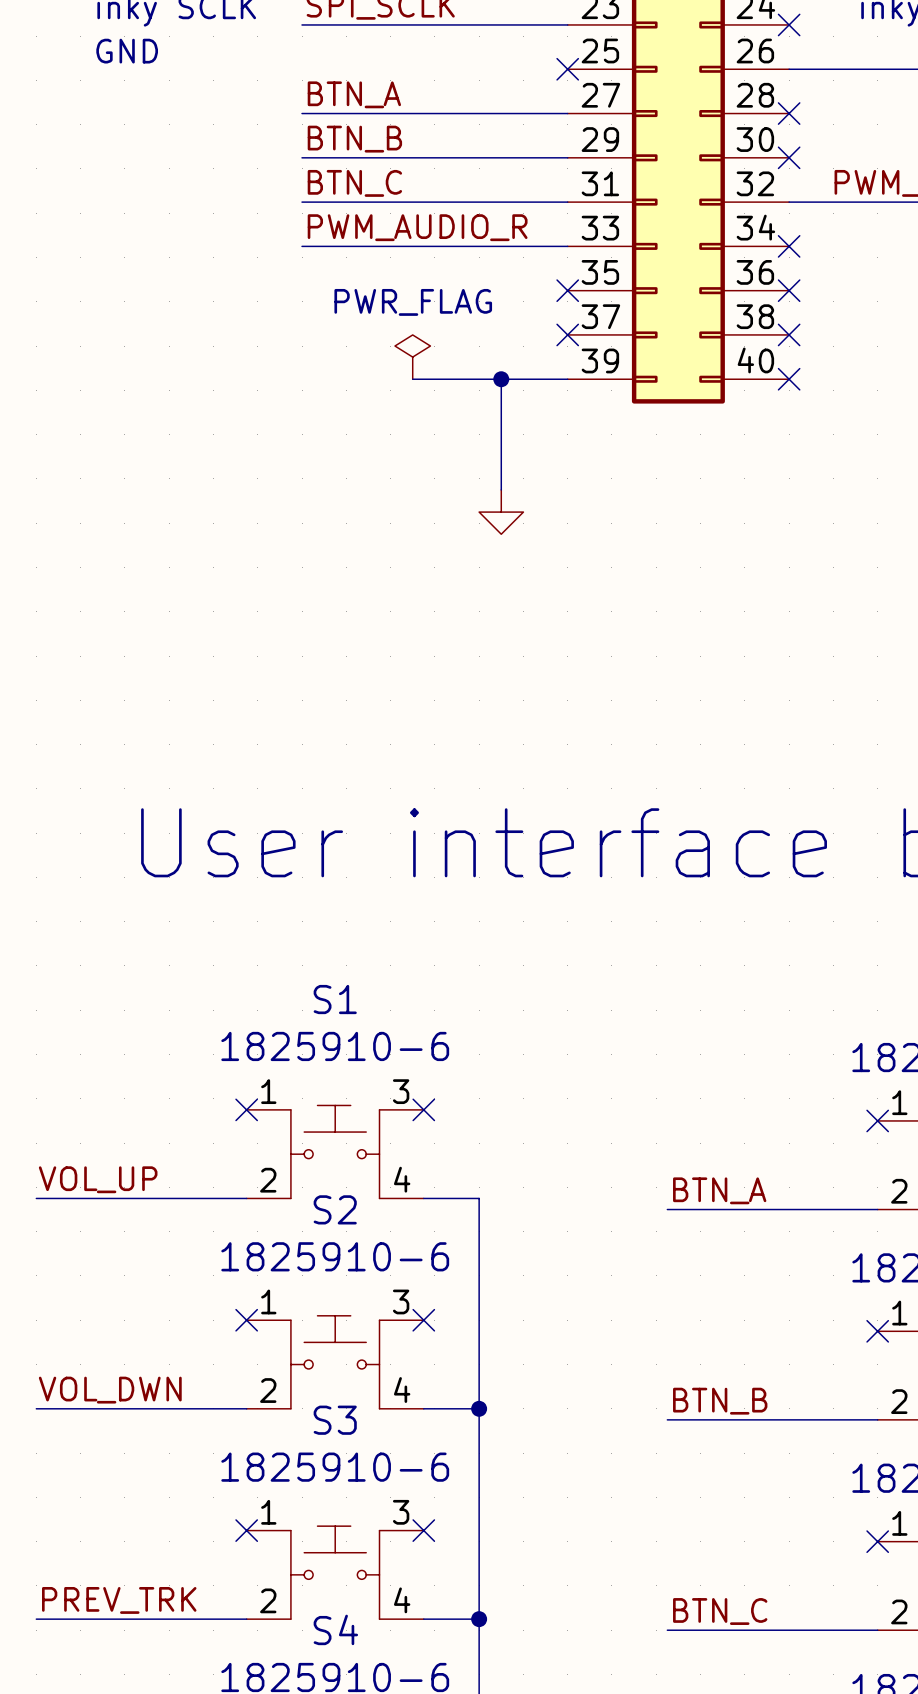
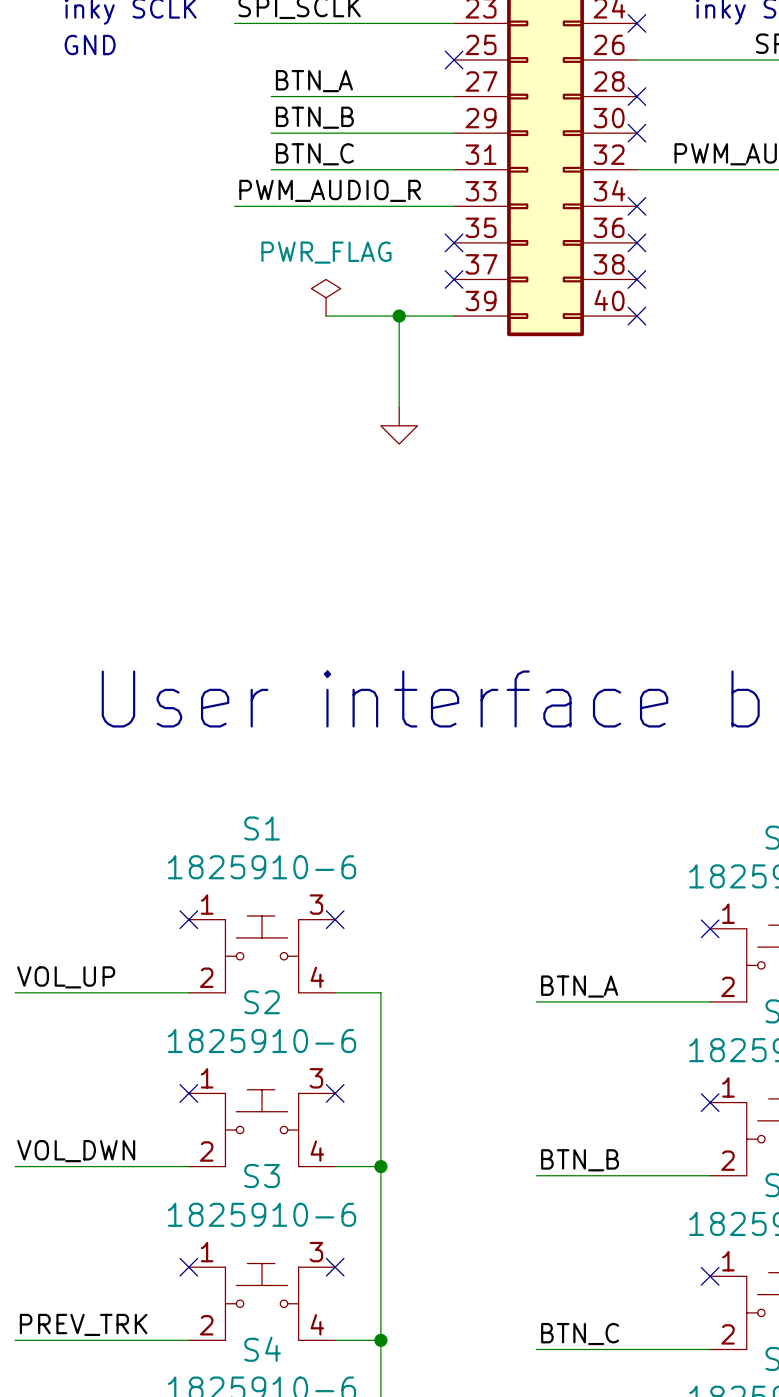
label position: BTN_A (354, 94) -> BTN_A (314, 81)
wire: (302, 113) (346, 113) -> none
label position: BTN_B (354, 139) -> BTN_B (314, 117)
wire: (302, 157) (346, 157) -> none
label position: BTN_C (354, 183) -> BTN_C (314, 154)
wire: (302, 202) (346, 202) -> none

